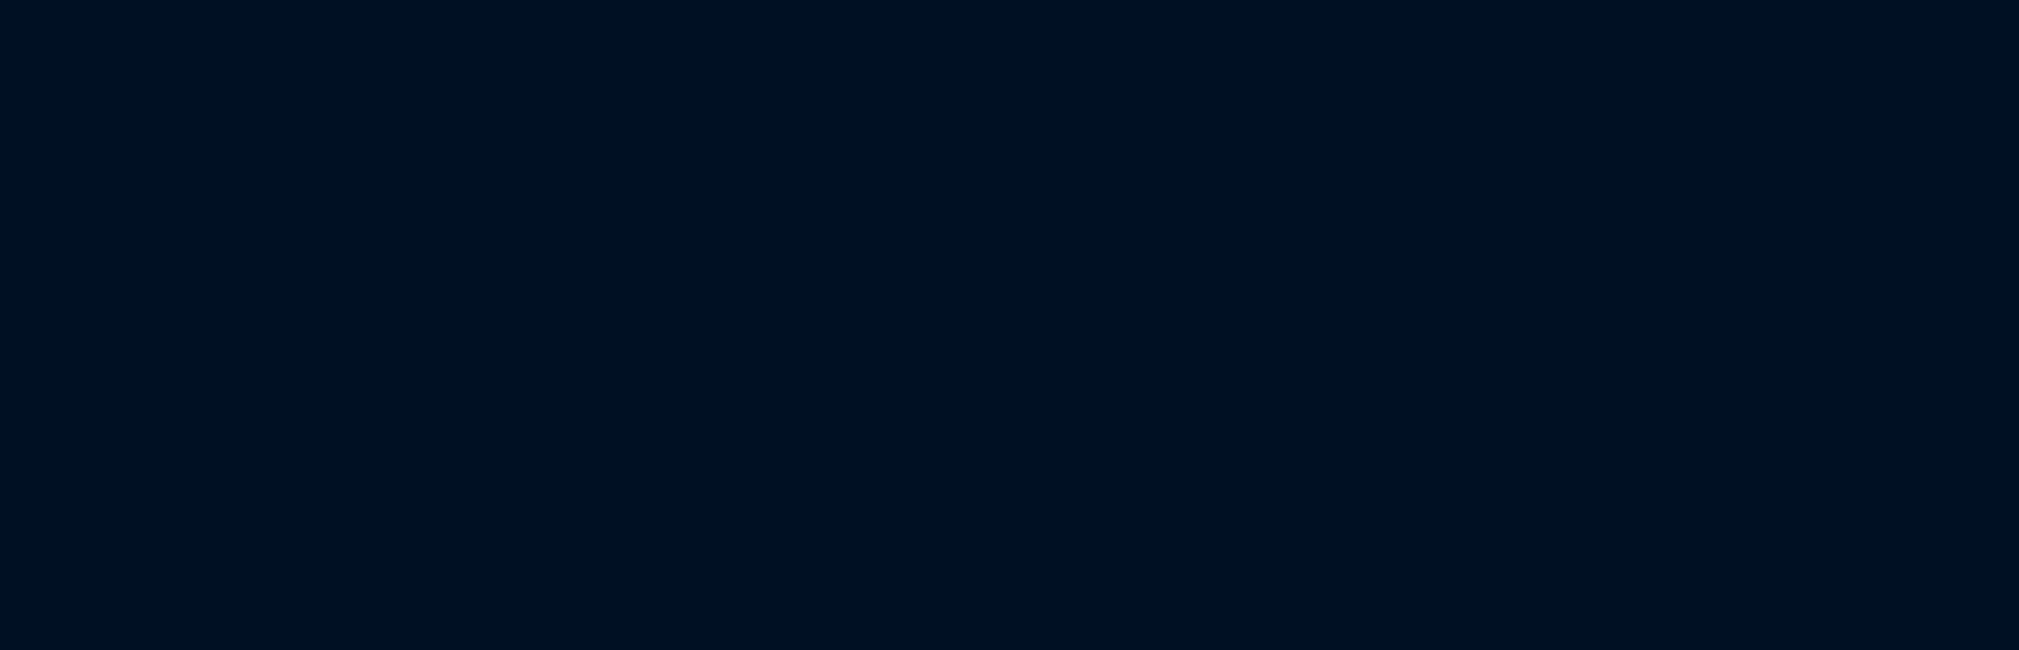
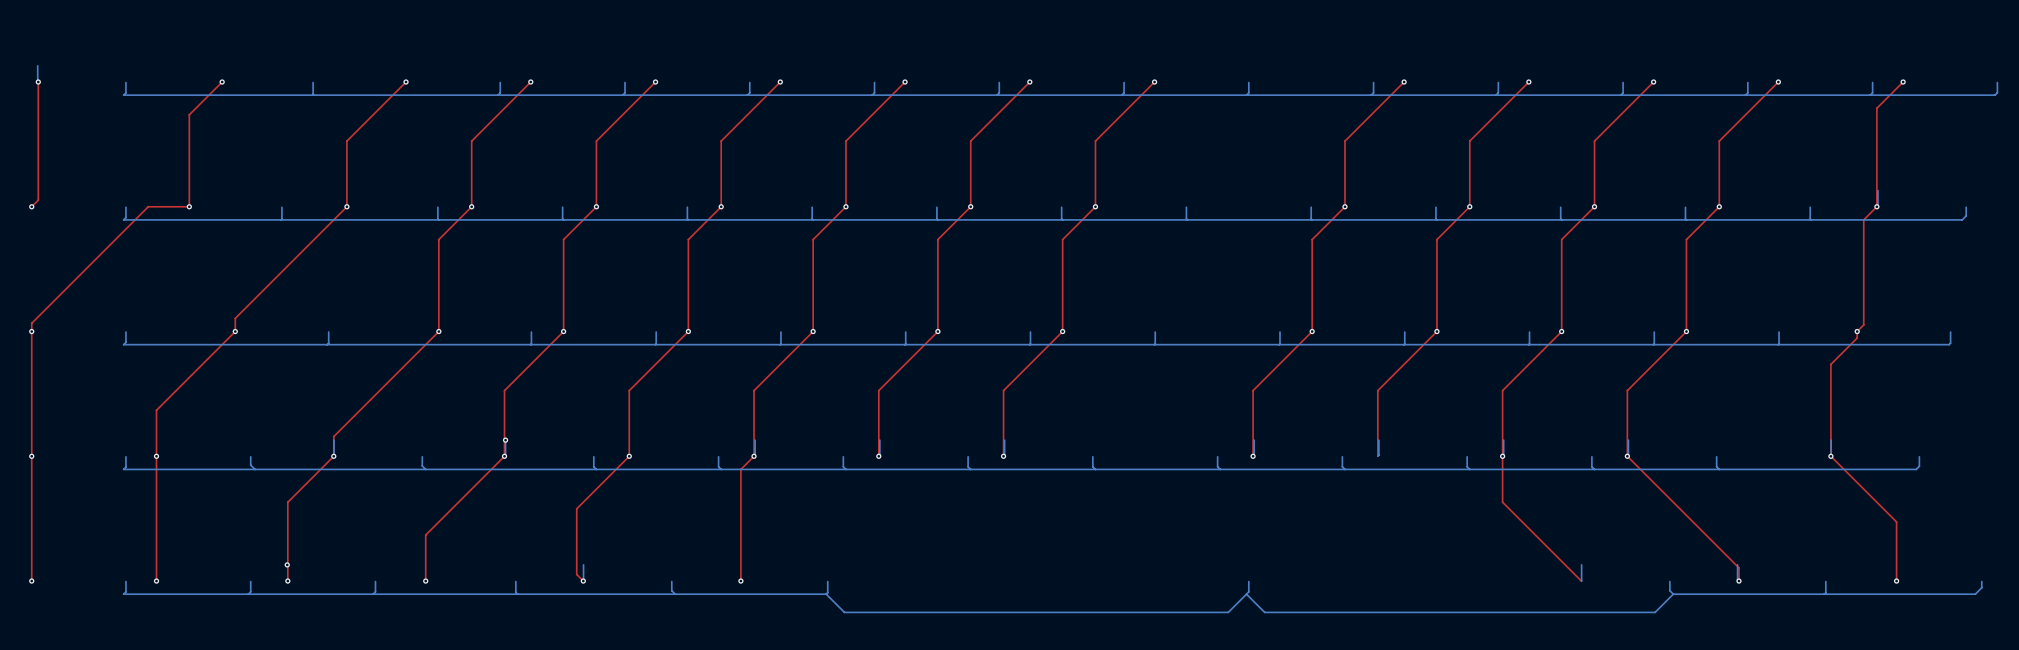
bottom track: none -> (37, 65) (38, 82)
top track: none -> (38, 82) (38, 200) (31, 206)
via: none -> (38, 82)
top track: none -> (222, 82) (189, 114) (189, 206) (148, 206) (31, 323) (31, 581)
via: none -> (222, 82)
bottom track: none -> (313, 82) (314, 95)
top track: none -> (406, 82) (346, 141) (346, 206) (235, 318) (235, 331) (156, 410) (156, 581)
via: none -> (406, 82)
bottom track: none -> (500, 82) (500, 92) (497, 95)
top track: none -> (530, 82) (471, 141) (471, 206) (438, 239) (438, 331) (333, 436) (333, 456) (287, 502) (287, 581)
via: none -> (530, 82)
bottom track: none -> (625, 82) (625, 92) (622, 95)
top track: none -> (655, 82) (596, 141) (596, 206) (563, 239) (563, 331) (504, 390) (504, 456) (425, 535) (425, 581)
via: none -> (655, 82)
bottom track: none -> (749, 82) (749, 92) (747, 95)
top track: none -> (780, 82) (721, 141) (721, 206) (688, 239) (688, 331) (629, 390) (629, 456) (576, 508) (576, 574) (583, 581)
via: none -> (780, 82)
bottom track: none -> (874, 82) (874, 92) (872, 95)
top track: none -> (905, 82) (845, 141) (845, 206) (813, 239) (813, 331) (754, 390) (754, 456) (740, 469) (740, 581)
via: none -> (905, 82)
bottom track: none -> (999, 82) (999, 92) (996, 95)
top track: none -> (1029, 82) (970, 141) (970, 206) (937, 239) (937, 331) (878, 390) (878, 456)
via: none -> (1029, 82)
bottom track: none -> (1124, 82) (1124, 92) (1121, 95)
top track: none -> (1154, 82) (1095, 141) (1095, 206) (1062, 239) (1062, 331) (1003, 390) (1003, 456)
via: none -> (1154, 82)
bottom track: none -> (1248, 82) (1248, 92) (1246, 95)
bottom track: none -> (1373, 82) (1373, 92) (1371, 95)
top track: none -> (1404, 82) (1345, 141) (1345, 206) (1312, 239) (1312, 331) (1253, 390) (1253, 456)
via: none -> (1404, 82)
bottom track: none -> (1498, 82) (1498, 92) (1496, 95)
top track: none -> (1528, 82) (1469, 141) (1469, 206) (1436, 239) (1436, 331) (1377, 390) (1377, 456)
via: none -> (1528, 82)
bottom track: none -> (1623, 82) (1623, 92) (1620, 95)
top track: none -> (1653, 82) (1594, 141) (1594, 206) (1561, 239) (1561, 331) (1502, 390) (1502, 502) (1581, 581)
via: none -> (1653, 82)
bottom track: none -> (1747, 82) (1747, 92) (1745, 95)
top track: none -> (1778, 82) (1719, 141) (1719, 206) (1686, 239) (1686, 331) (1627, 390) (1627, 456) (1738, 567) (1738, 581)
via: none -> (1778, 82)
bottom track: none -> (1872, 82) (1872, 92) (1870, 95)
top track: none -> (1903, 82) (1876, 108) (1876, 206) (1863, 219) (1863, 324) (1857, 331) (1857, 338) (1830, 364) (1830, 456) (1896, 521) (1896, 581)
via: none -> (1903, 82)
bottom track: none -> (1997, 82) (1997, 92) (1995, 95) (123, 95) (125, 92) (125, 82)
bottom track: none -> (1877, 190) (1876, 206)
via: none -> (31, 206)
via: none -> (189, 206)
via: none -> (346, 206)
via: none -> (471, 206)
via: none -> (596, 206)
via: none -> (721, 206)
via: none -> (845, 206)
via: none -> (970, 206)
via: none -> (1095, 206)
via: none -> (1345, 206)
via: none -> (1469, 206)
via: none -> (1594, 206)
via: none -> (1719, 206)
via: none -> (1876, 206)
bottom track: none -> (281, 207) (281, 219)
bottom track: none -> (437, 207) (438, 219)
bottom track: none -> (562, 207) (563, 219)
bottom track: none -> (687, 207) (688, 219)
bottom track: none -> (812, 207) (813, 219)
bottom track: none -> (936, 207) (937, 219)
bottom track: none -> (1061, 207) (1062, 219)
bottom track: none -> (1186, 207) (1187, 219)
bottom track: none -> (1311, 207) (1312, 219)
bottom track: none -> (1435, 207) (1436, 219)
bottom track: none -> (1560, 207) (1561, 219)
bottom track: none -> (1685, 207) (1686, 219)
bottom track: none -> (1810, 207) (1811, 219)
bottom track: none -> (1966, 207) (1966, 215) (1962, 219) (123, 219) (125, 217) (125, 207)
via: none -> (31, 331)
via: none -> (235, 331)
via: none -> (438, 331)
via: none -> (563, 331)
via: none -> (688, 331)
via: none -> (813, 331)
via: none -> (937, 331)
via: none -> (1062, 331)
via: none -> (1312, 331)
via: none -> (1436, 331)
via: none -> (1561, 331)
via: none -> (1686, 331)
via: none -> (1857, 331)
bottom track: none -> (328, 332) (327, 344)
bottom track: none -> (531, 332) (530, 344)
bottom track: none -> (656, 332) (655, 344)
bottom track: none -> (780, 332) (780, 344)
bottom track: none -> (905, 332) (905, 344)
bottom track: none -> (1030, 332) (1029, 344)
bottom track: none -> (1155, 332) (1154, 344)
bottom track: none -> (1280, 332) (1279, 344)
bottom track: none -> (1404, 332) (1404, 344)
bottom track: none -> (1529, 332) (1528, 344)
bottom track: none -> (1654, 332) (1653, 344)
bottom track: none -> (1779, 332) (1778, 344)
bottom track: none -> (1950, 332) (1949, 344) (123, 344) (125, 342) (125, 332)
bottom track: none -> (334, 440) (333, 456)
bottom track: none -> (505, 440) (504, 456)
via: none -> (505, 440)
bottom track: none -> (755, 440) (754, 456)
bottom track: none -> (879, 440) (878, 456)
bottom track: none -> (1004, 440) (1003, 456)
bottom track: none -> (1254, 440) (1253, 456)
bottom track: none -> (1378, 440) (1377, 456)
bottom track: none -> (1503, 440) (1502, 456)
bottom track: none -> (1628, 440) (1627, 456)
bottom track: none -> (1831, 440) (1830, 456)
via: none -> (31, 456)
via: none -> (156, 456)
bottom track: none -> (250, 456) (250, 465) (254, 469)
via: none -> (333, 456)
bottom track: none -> (422, 456) (422, 465) (425, 469)
via: none -> (504, 456)
bottom track: none -> (593, 456) (593, 466) (596, 469)
via: none -> (629, 456)
bottom track: none -> (718, 456) (718, 466) (721, 469)
via: none -> (754, 456)
bottom track: none -> (843, 456) (843, 466) (845, 469)
via: none -> (878, 456)
bottom track: none -> (968, 456) (968, 466) (970, 469)
via: none -> (1003, 456)
bottom track: none -> (1092, 456) (1092, 466) (1095, 469)
bottom track: none -> (1217, 456) (1217, 466) (1220, 469)
via: none -> (1253, 456)
bottom track: none -> (1342, 456) (1342, 466) (1345, 469)
bottom track: none -> (1467, 456) (1467, 466) (1469, 469)
via: none -> (1502, 456)
bottom track: none -> (1591, 456) (1591, 466) (1594, 469)
via: none -> (1627, 456)
bottom track: none -> (1716, 456) (1716, 466) (1719, 469)
via: none -> (1830, 456)
bottom track: none -> (1919, 456) (1919, 466) (1916, 469) (123, 469) (125, 467) (125, 456)
via: none -> (287, 564)
bottom track: none -> (583, 564) (583, 581)
bottom track: none -> (1581, 564) (1581, 581)
bottom track: none -> (1737, 564) (1738, 581)
via: none -> (31, 581)
bottom track: none -> (125, 581) (125, 591) (123, 594) (826, 594)
via: none -> (156, 581)
bottom track: none -> (250, 581) (250, 591) (248, 594)
via: none -> (287, 581)
bottom track: none -> (375, 581) (375, 591) (373, 594)
via: none -> (425, 581)
bottom track: none -> (515, 581) (515, 592) (517, 594)
via: none -> (583, 581)
bottom track: none -> (671, 581) (671, 590) (675, 594)
via: none -> (740, 581)
bottom track: none -> (827, 581) (826, 594)
bottom track: none -> (1248, 581) (1248, 591) (1228, 612) (844, 612) (826, 594)
bottom track: none -> (1669, 581) (1669, 590) (1673, 594)
via: none -> (1738, 581)
bottom track: none -> (1825, 581) (1824, 594)
via: none -> (1896, 581)
bottom track: none -> (1981, 581) (1981, 587) (1975, 594) (1673, 594)
bottom track: none -> (1673, 594) (1655, 612) (1264, 612) (1246, 594)

